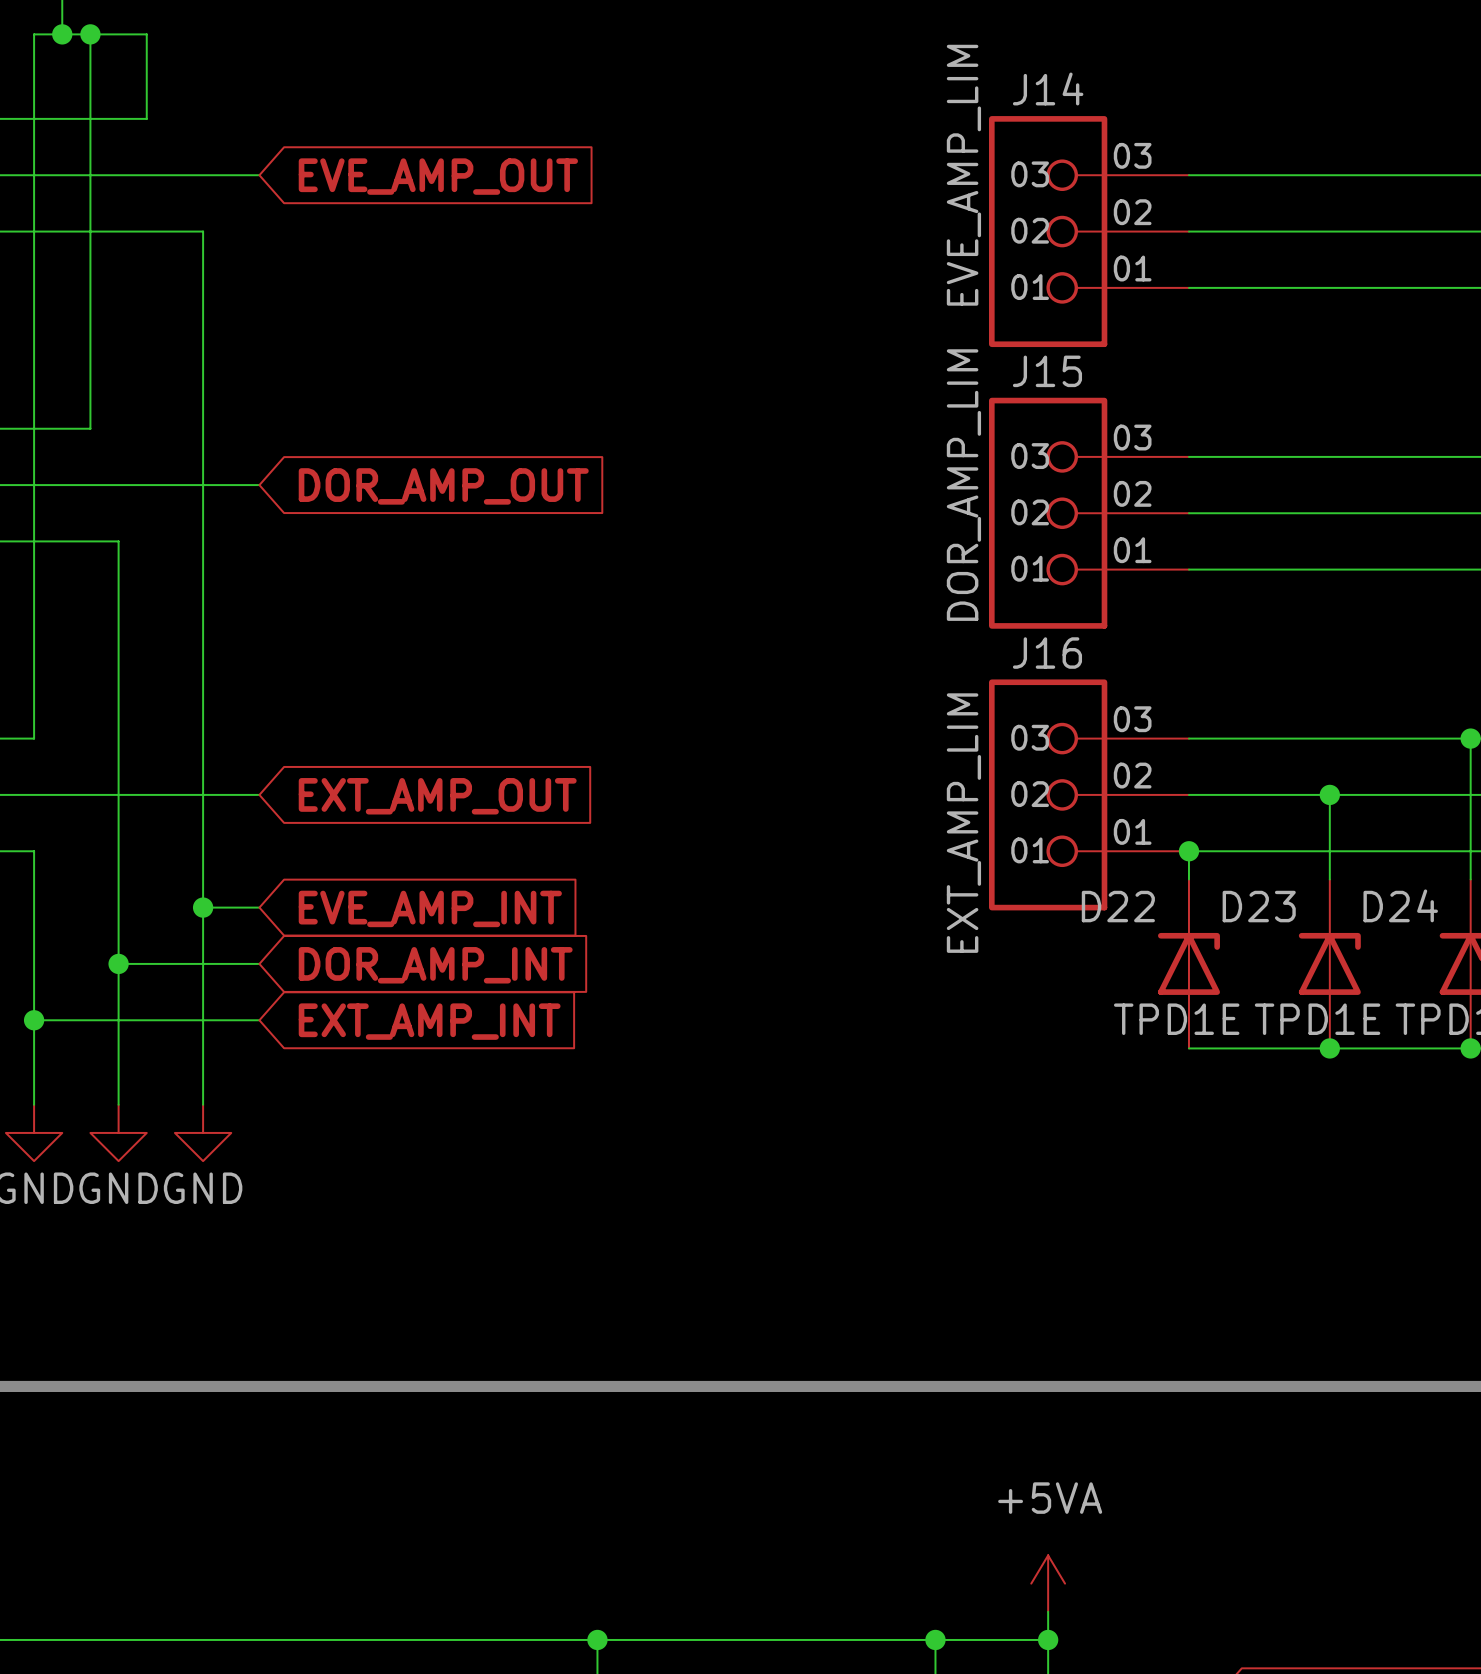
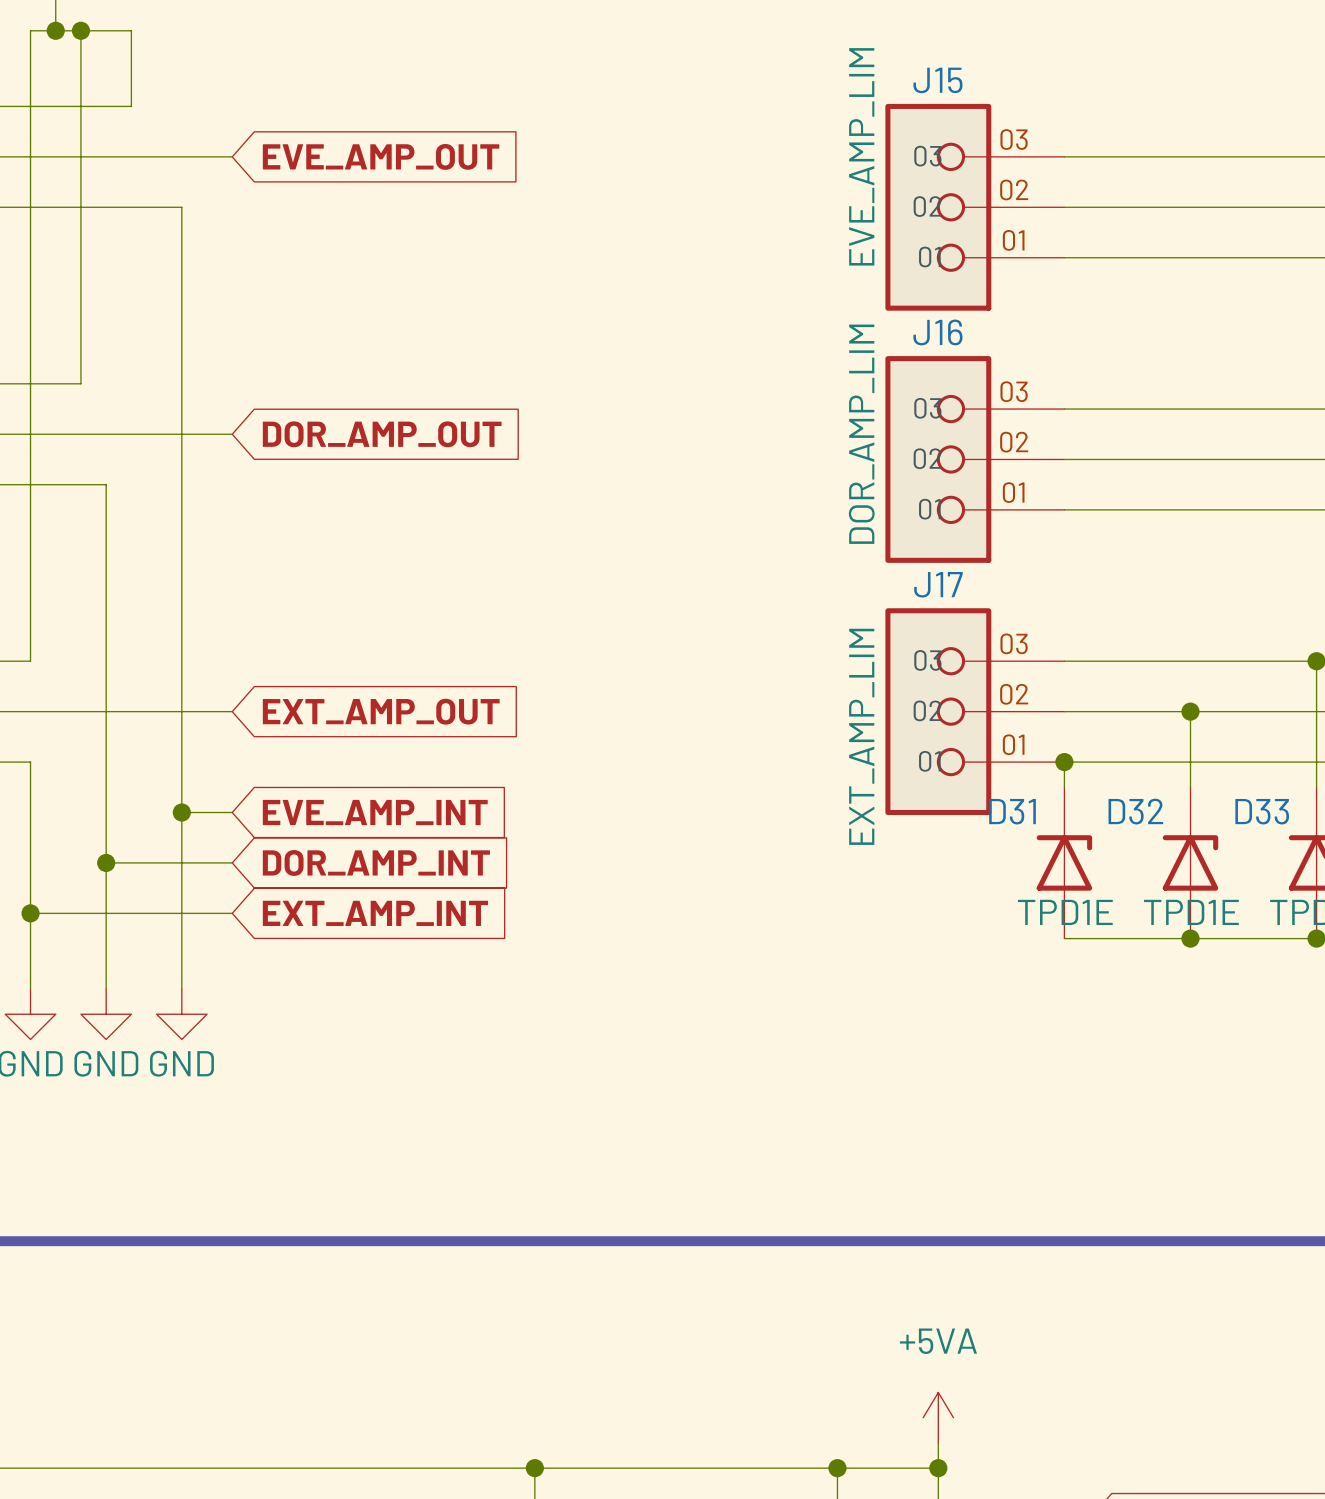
J14 name: J14 (1048, 88) -> J15 (937, 80)
J15 name: J15 (1047, 371) -> J16 (937, 332)
J16 name: J16 (1047, 653) -> J17 (938, 584)
D24 name: D24 (1400, 905) -> D33 (1262, 811)
D22 name: D22 (1118, 906) -> D31 (1012, 811)
D23 name: D23 (1259, 906) -> D32 (1135, 811)

